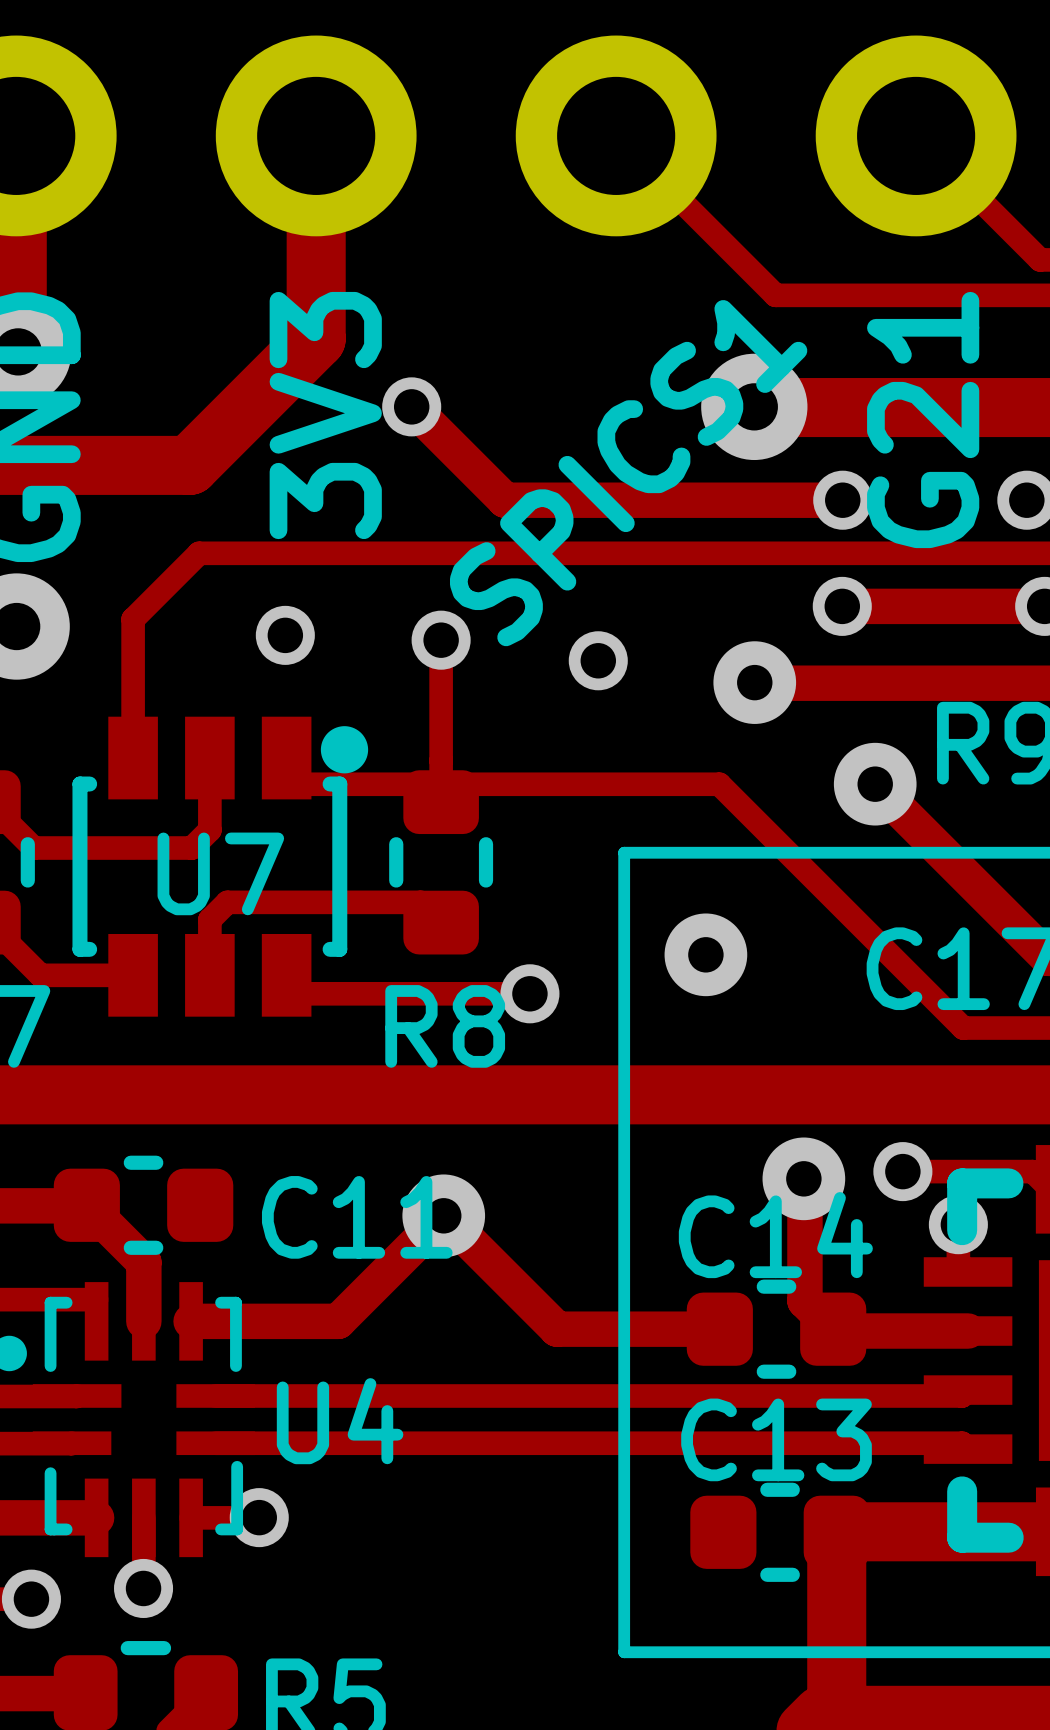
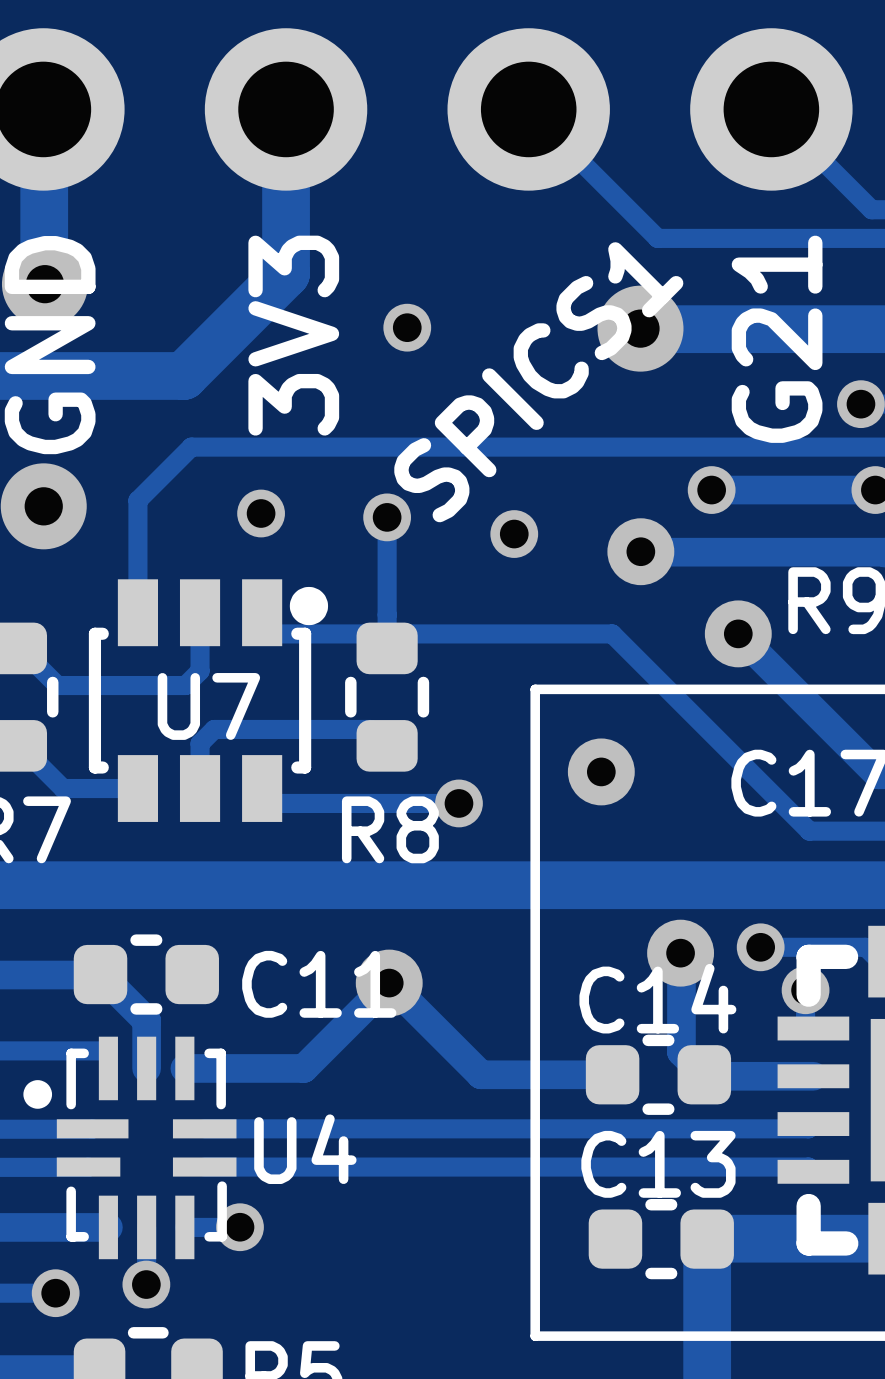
track: (411, 406) (505, 500) (842, 500) -> none
via position: (411, 406) -> (407, 327)
via: (842, 500) -> none

